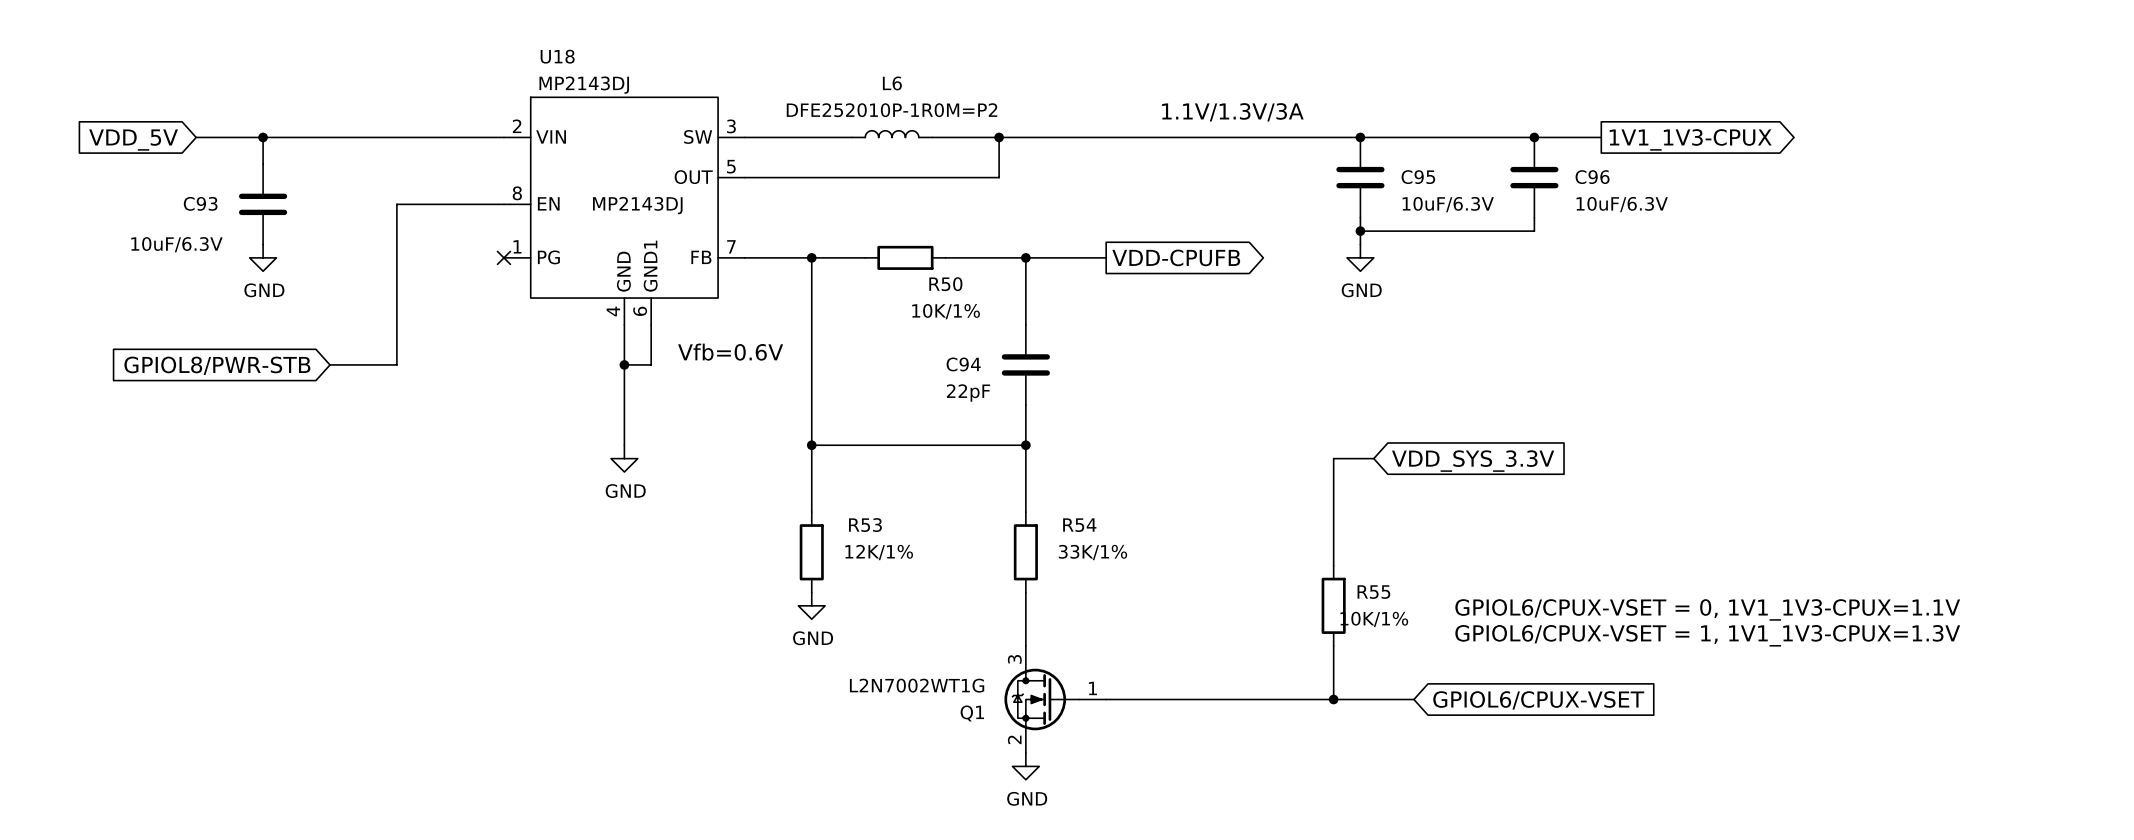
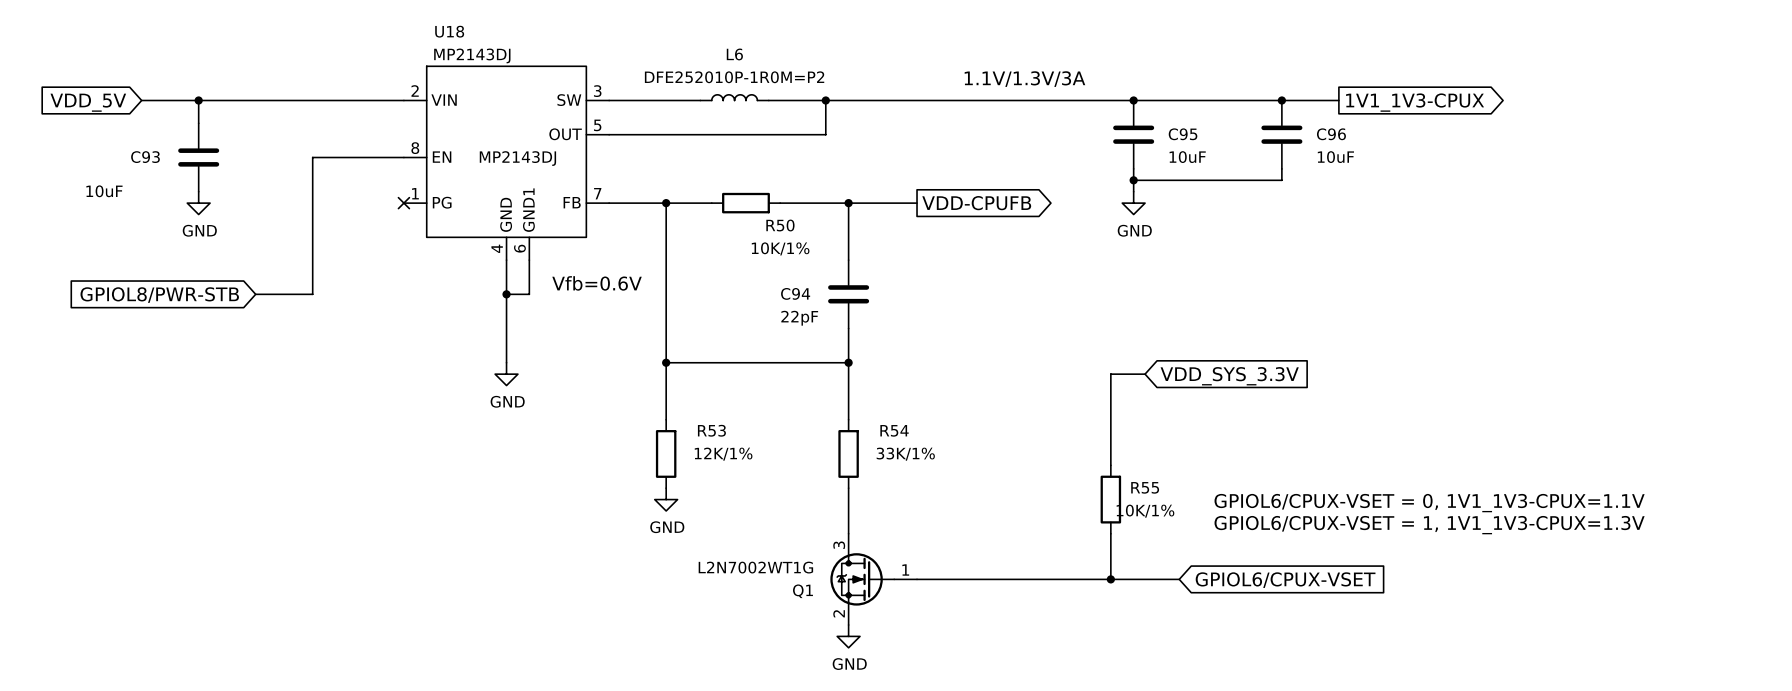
C95 value: 10uF/6.3V (1448, 204) -> 10uF (1187, 157)
C96 value: 10uF/6.3V (1622, 204) -> 10uF (1335, 157)
C93 value: 10uF/6.3V (176, 244) -> 10uF (104, 191)

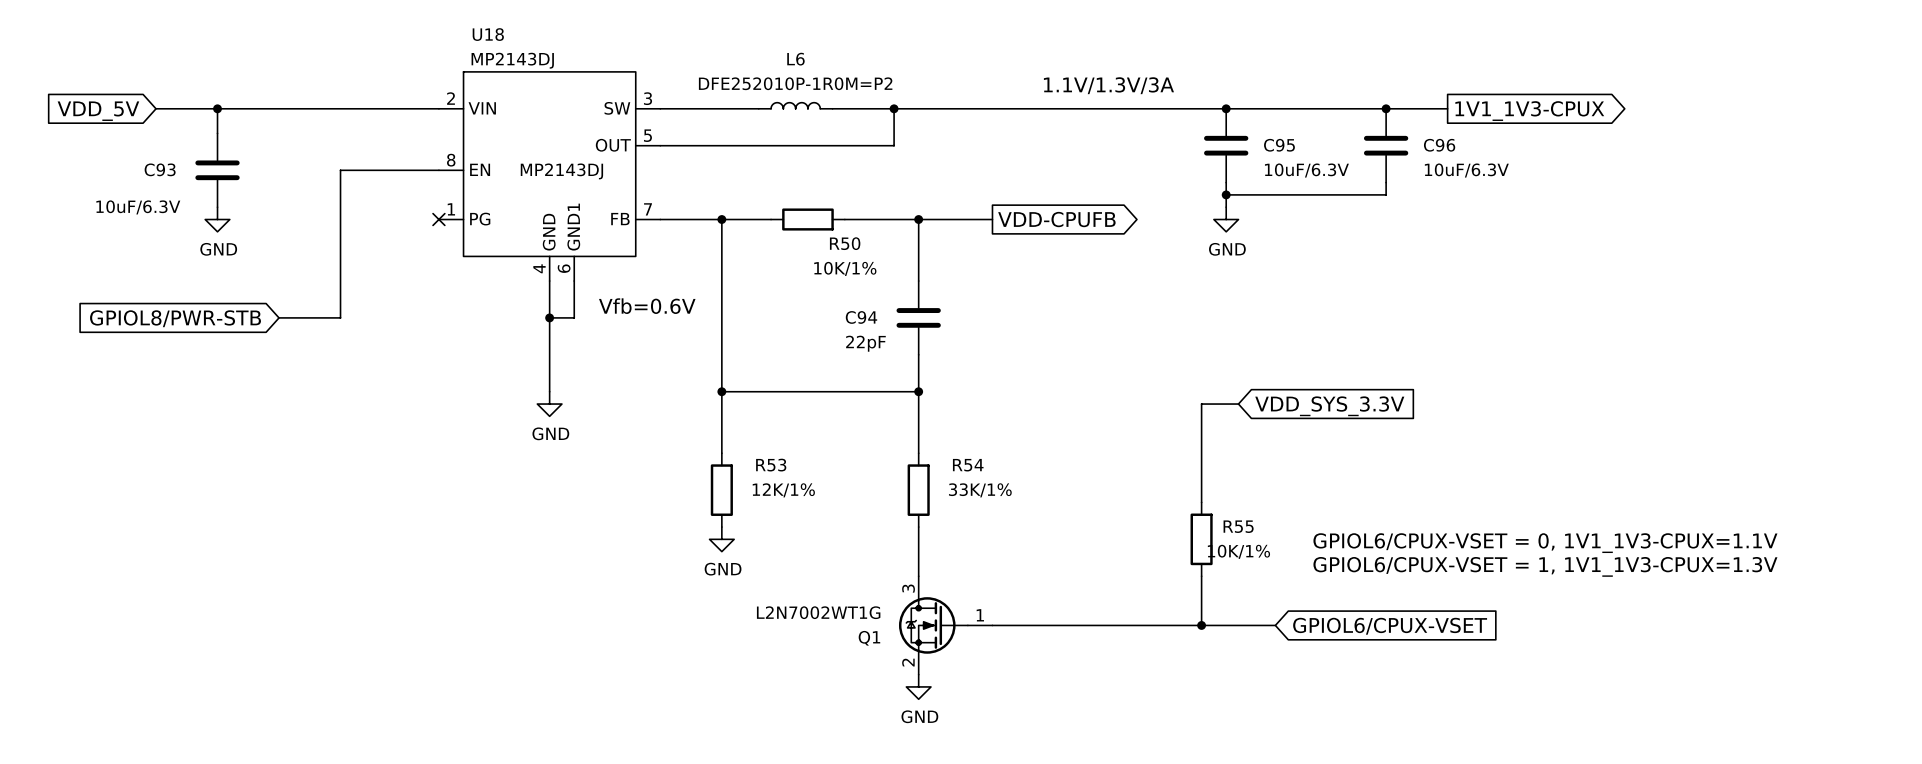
C95 value: 10uF (1187, 157) -> 10uF/6.3V (1306, 170)
C96 value: 10uF (1335, 157) -> 10uF/6.3V (1466, 170)
C93 value: 10uF (104, 191) -> 10uF/6.3V (138, 207)

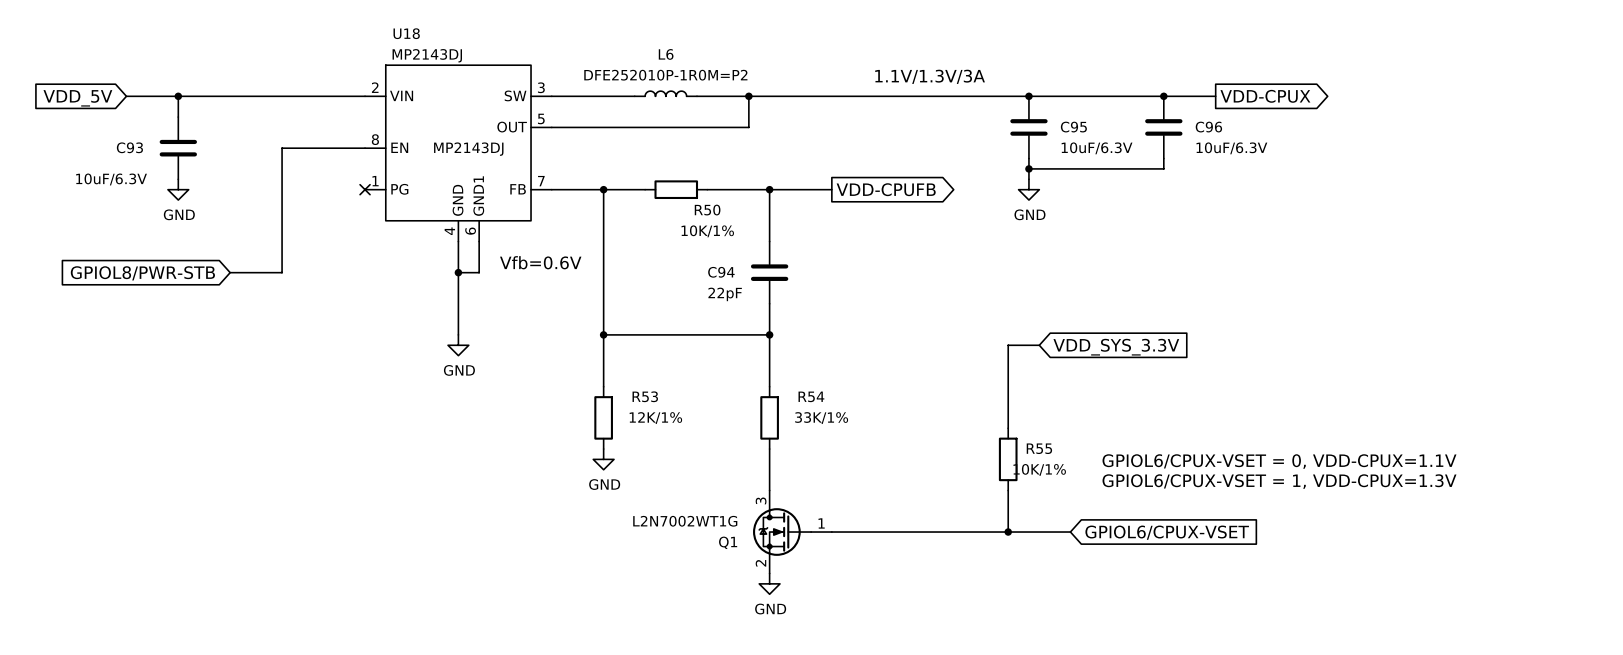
global label: 1V1_1V3-CPUX (1529, 111) -> VDD-CPUX (1265, 96)
text: GPIOL6/CPUX-VSET = 0, 1V1_1V3-CPUX=1.1V (1545, 543) -> GPIOL6/CPUX-VSET = 0, VDD-CPUX=1.1V (1279, 461)
text: GPIOL6/CPUX-VSET = 1, 1V1_1V3-CPUX=1.3V (1545, 566) -> GPIOL6/CPUX-VSET = 1, VDD-CPUX=1.3V (1279, 481)

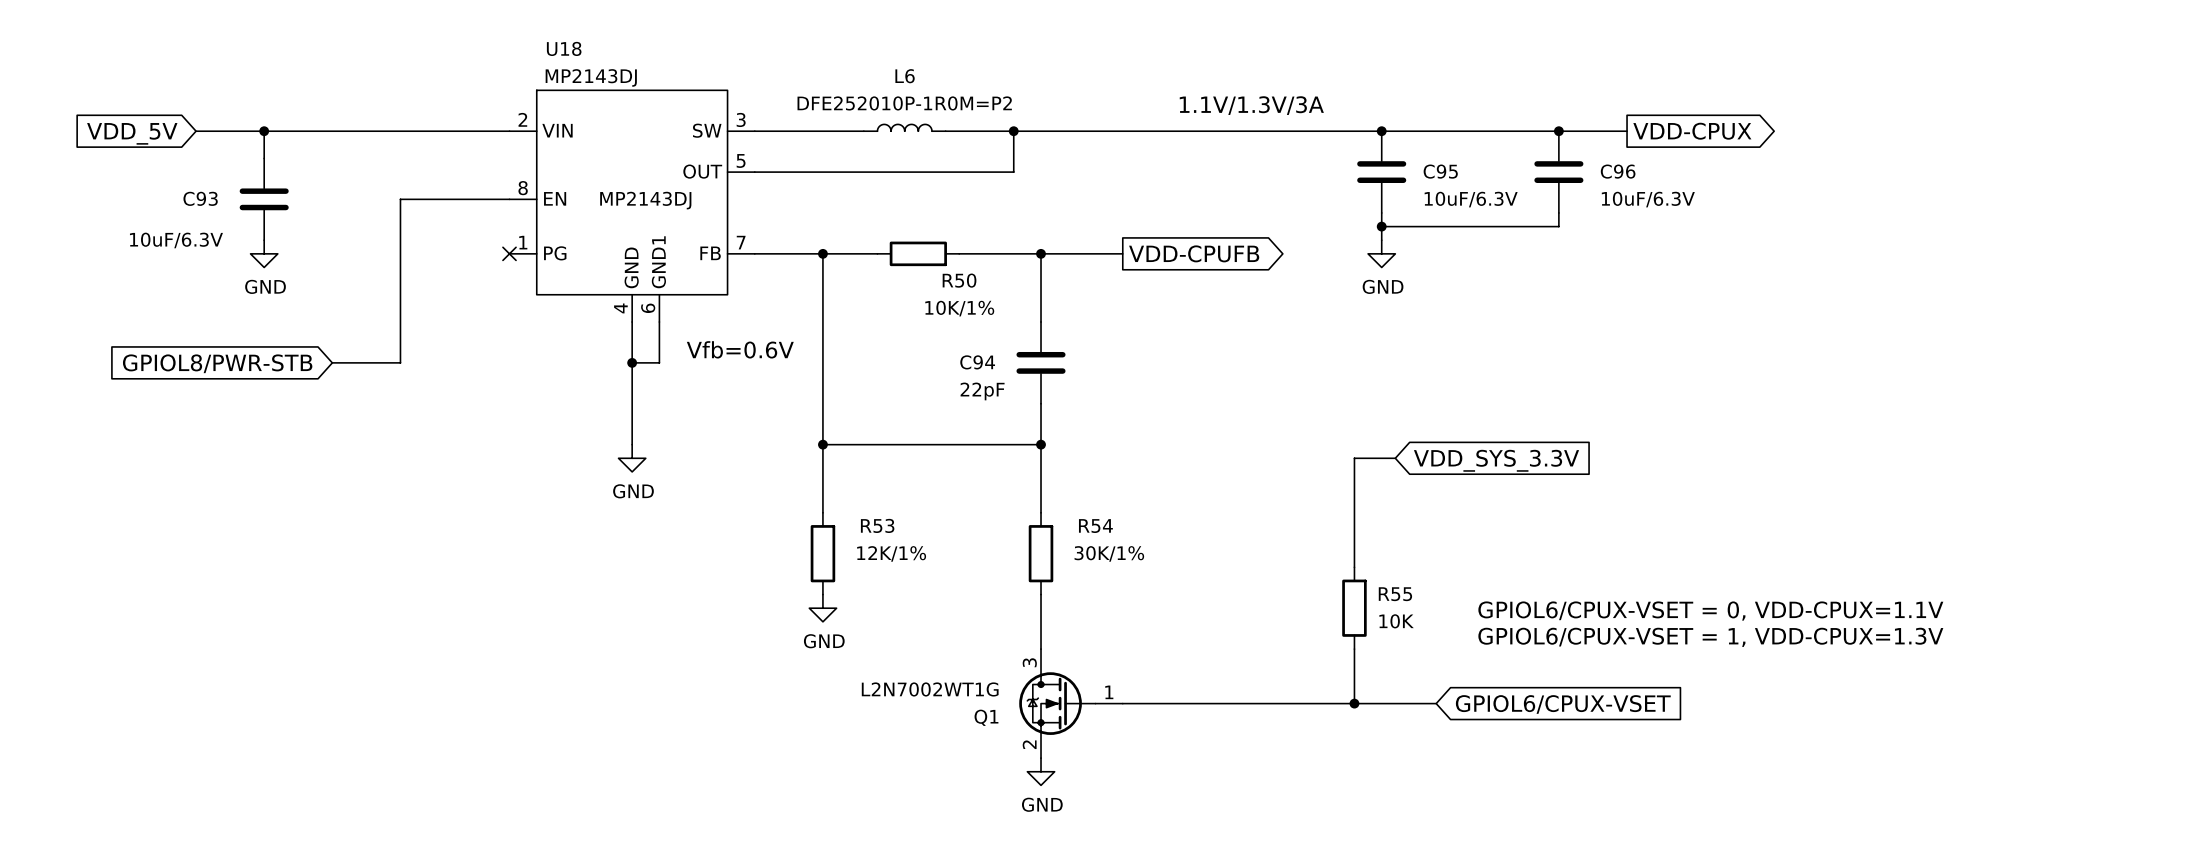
R54 value: 33K/1% (821, 418) -> 30K/1% (1109, 553)
R55 value: 10K/1% (1039, 469) -> 10K (1396, 621)

